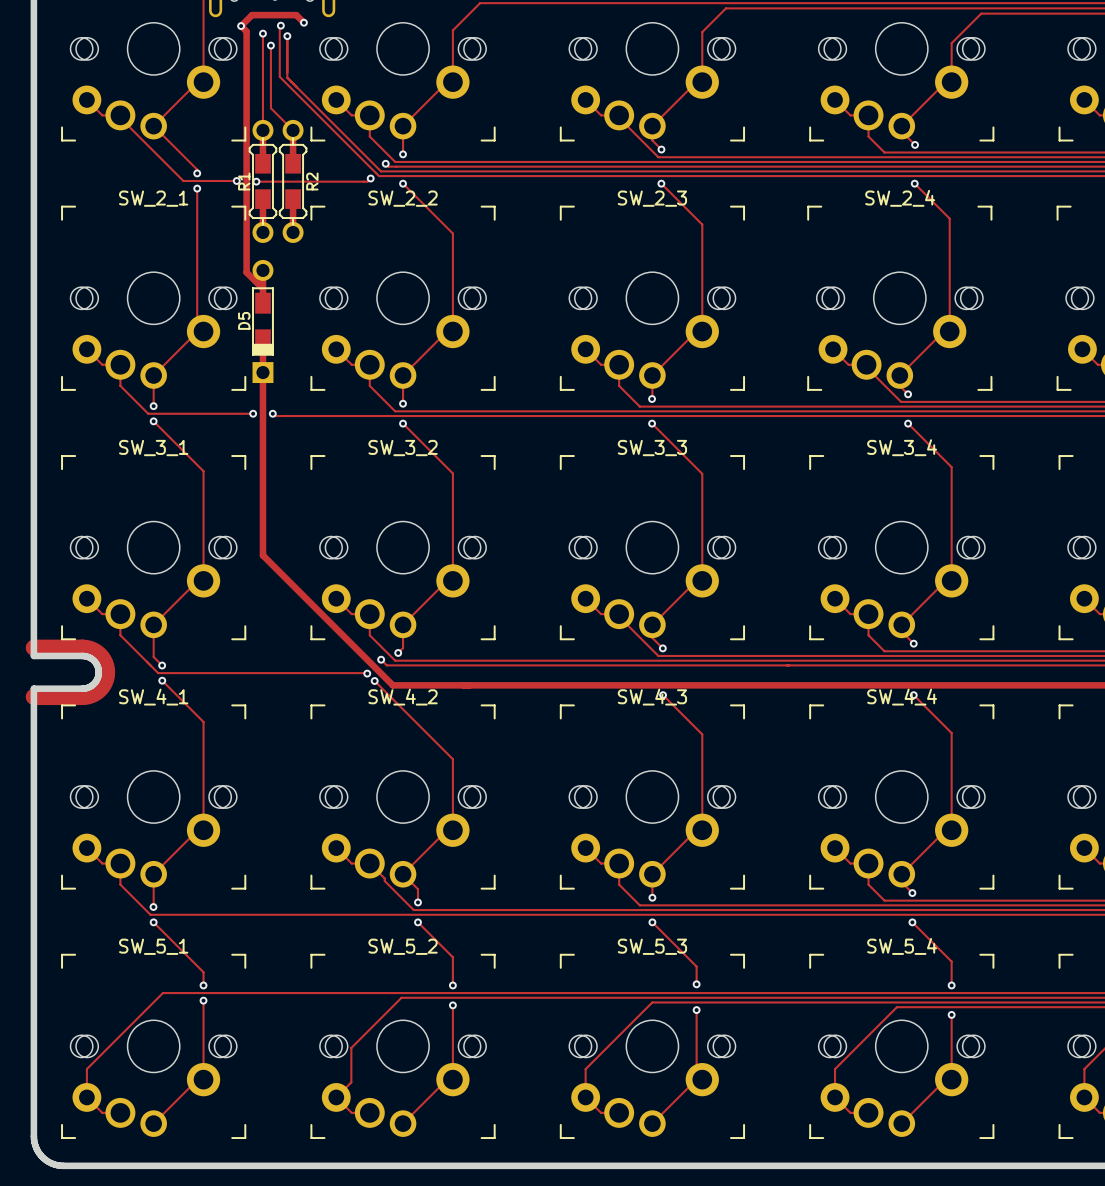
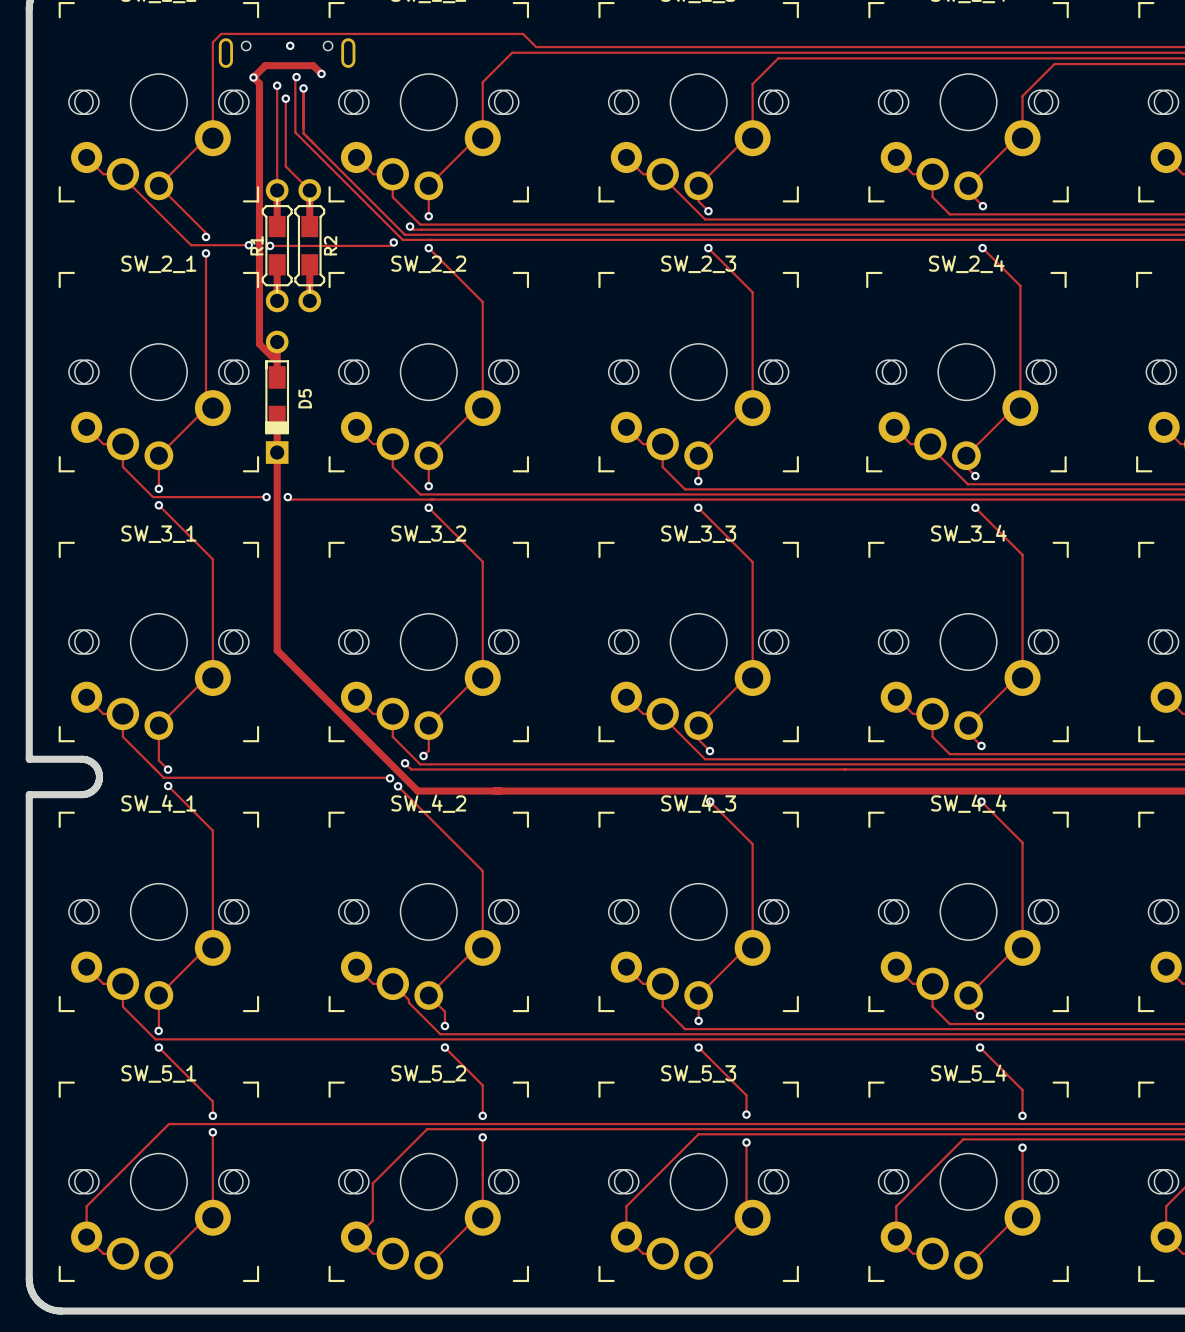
D5 name position: D5 (244, 320) -> D5 (305, 398)
drawing: [25, 639, 116, 706] -> none

